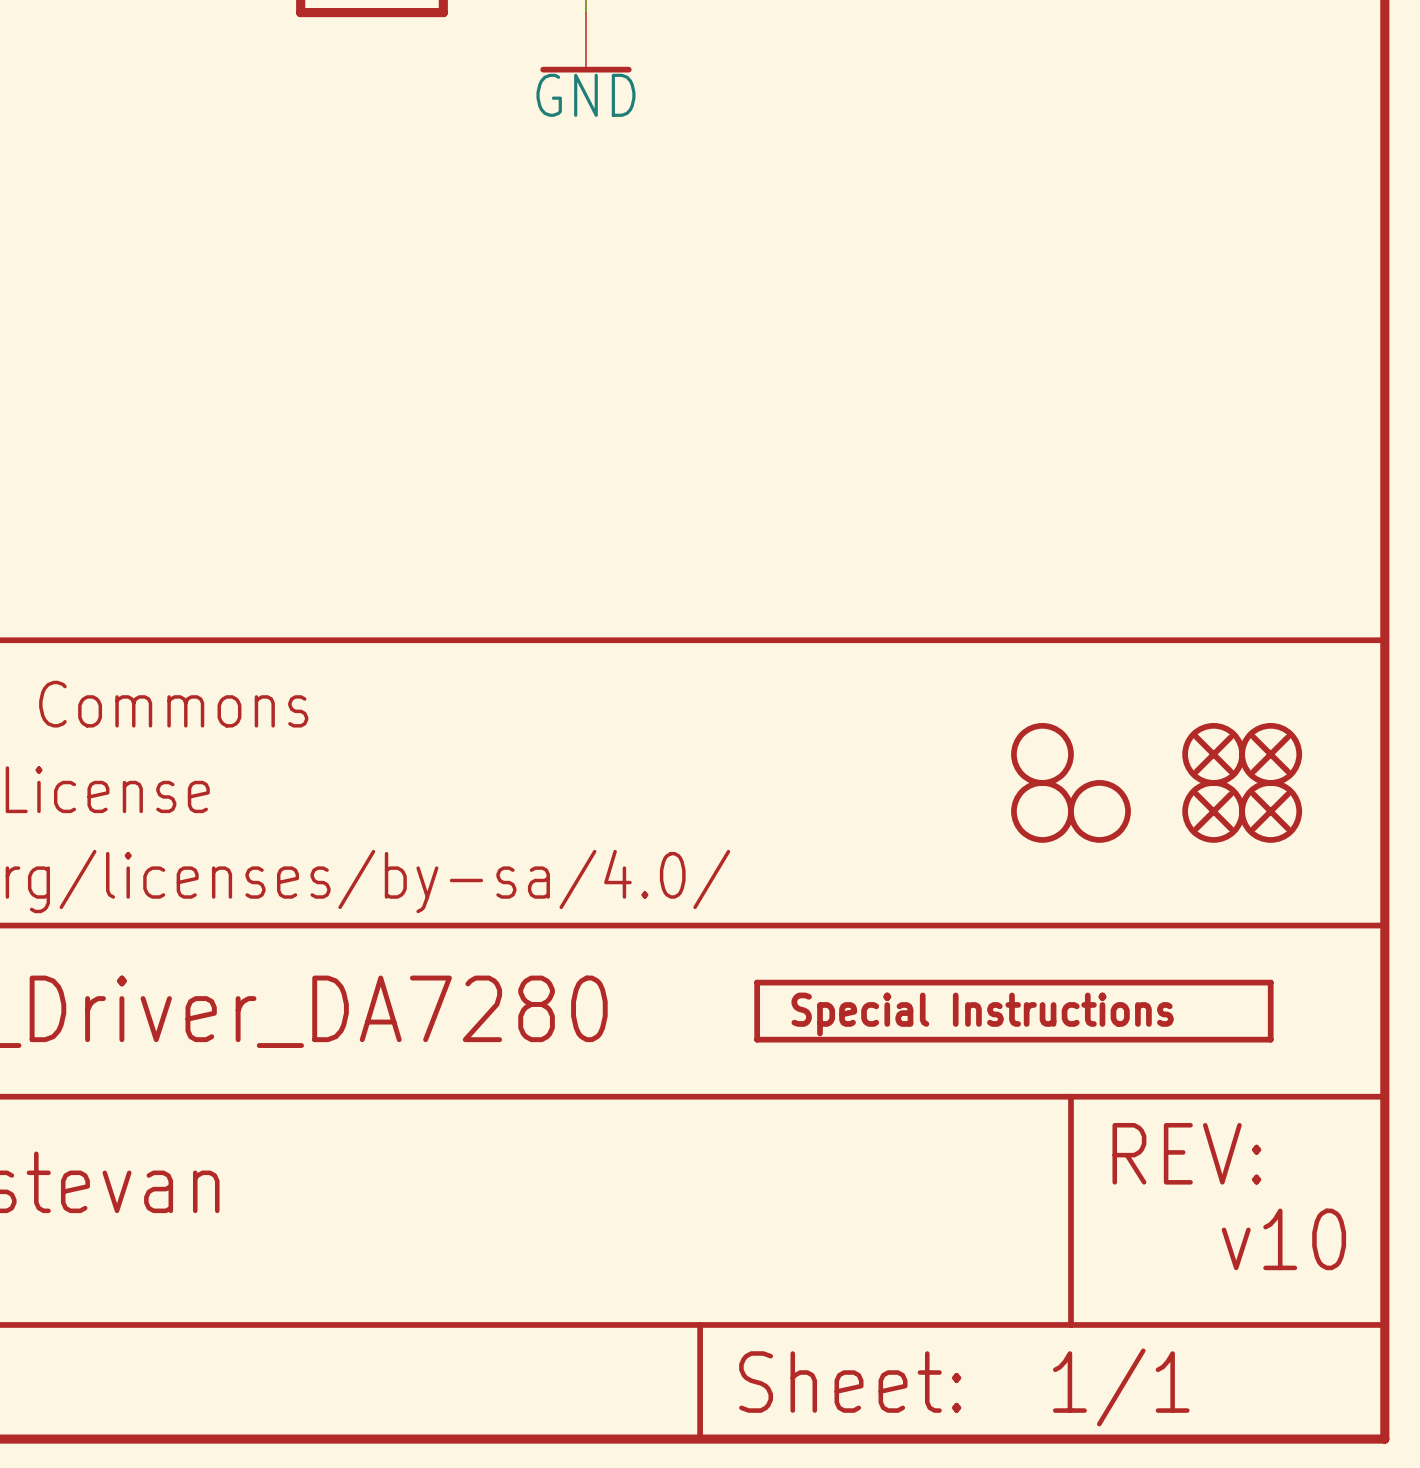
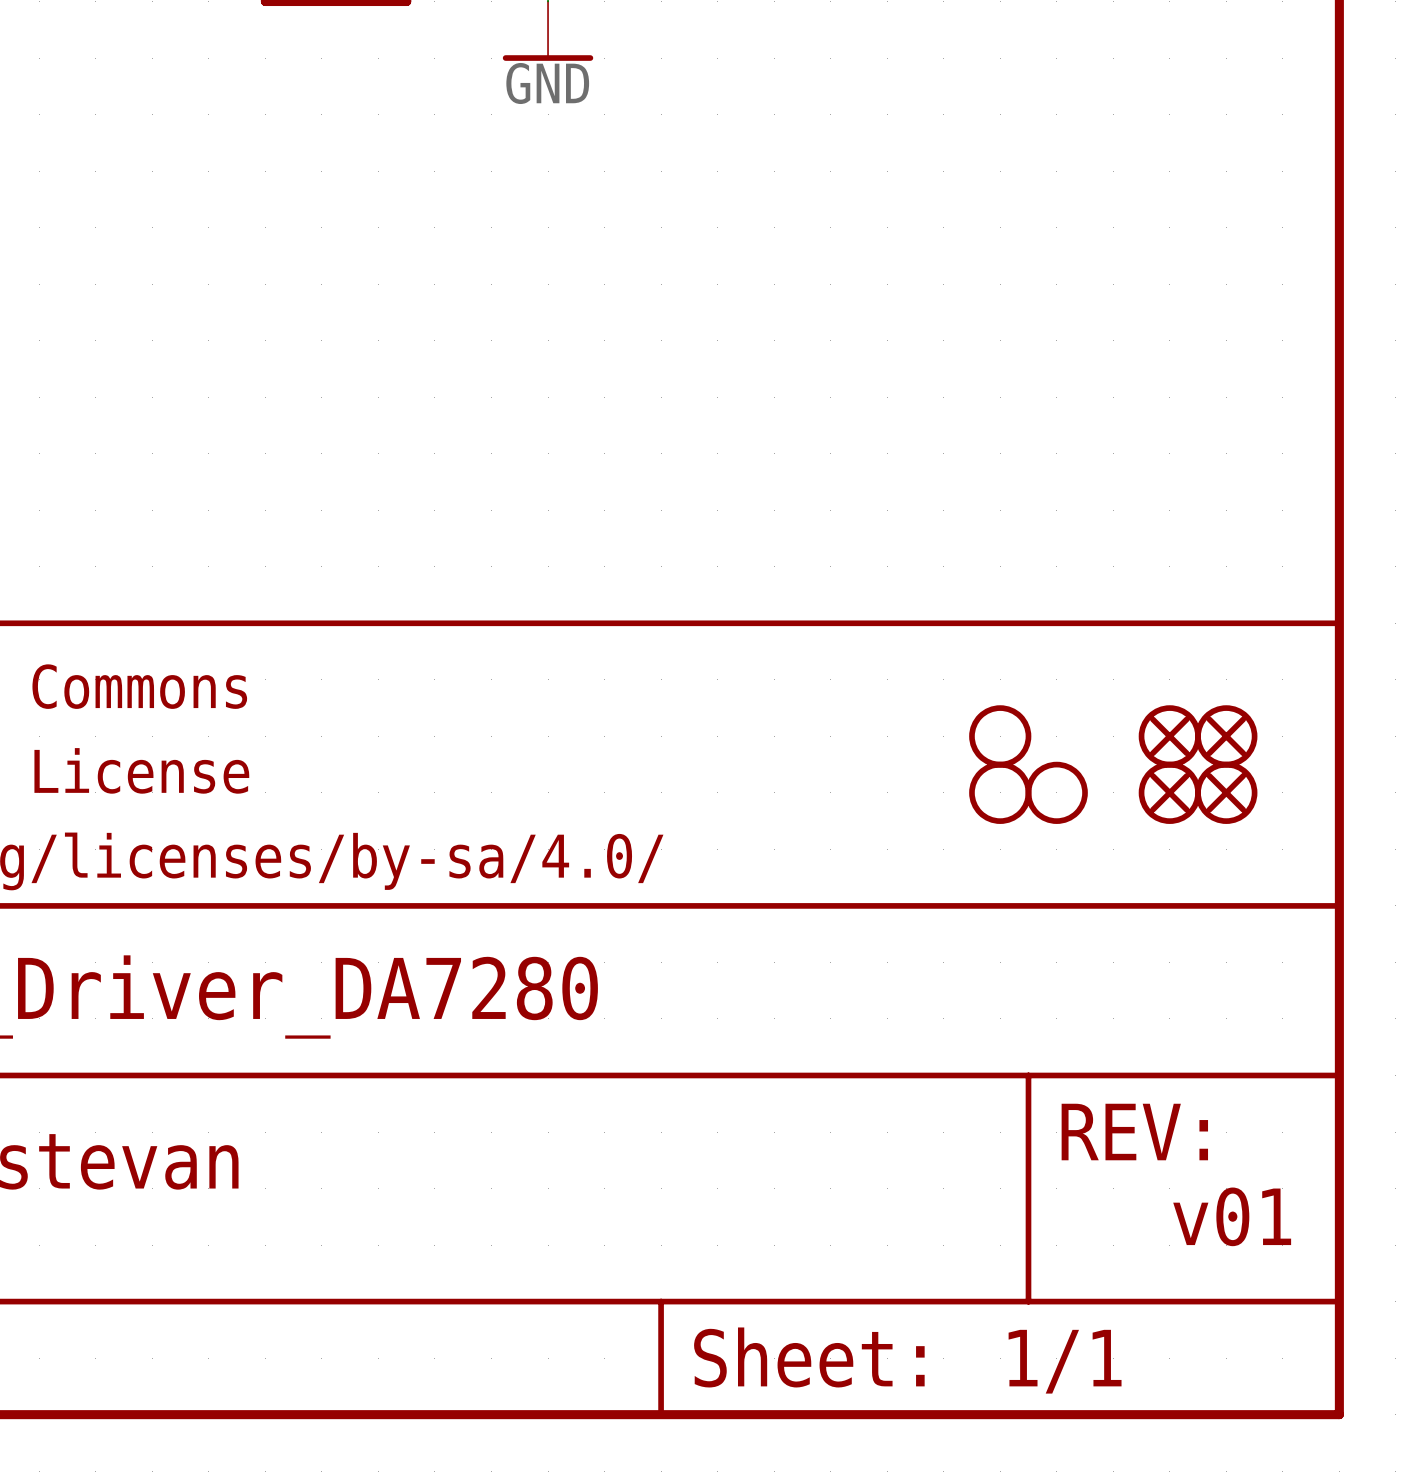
part: (1013, 1011) -> none
text: v10 (1283, 1239) -> v01 (1232, 1216)

